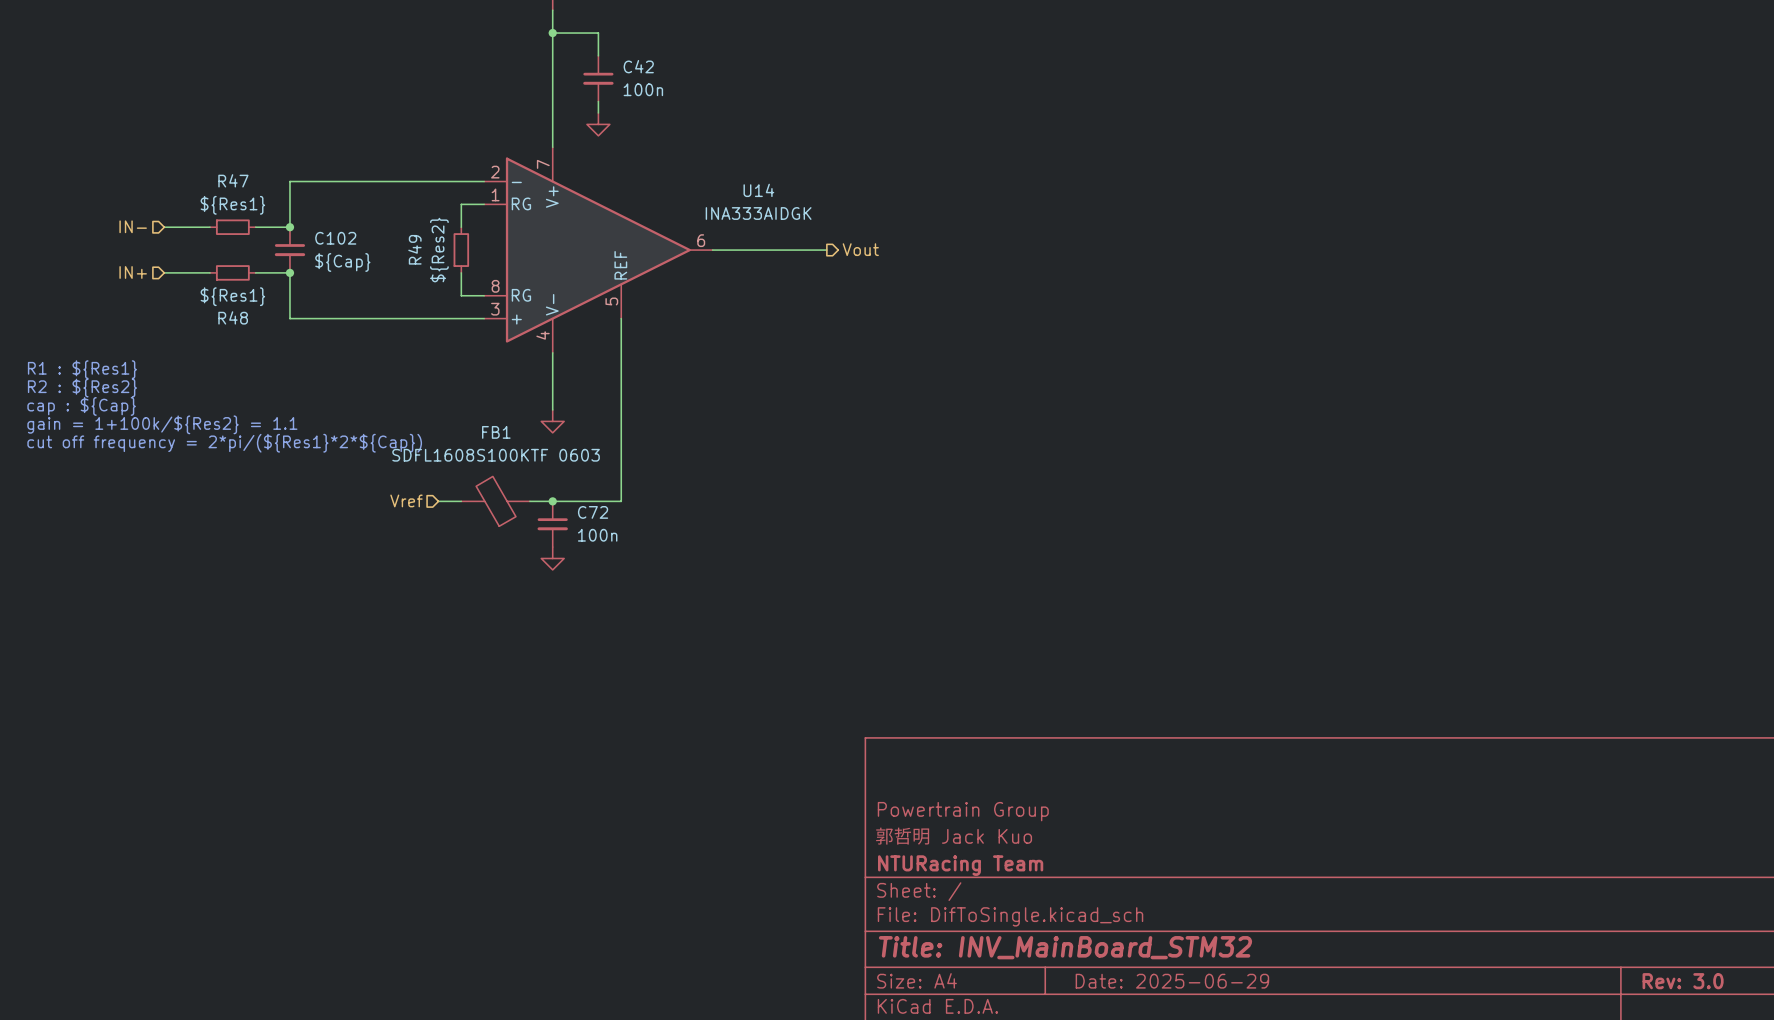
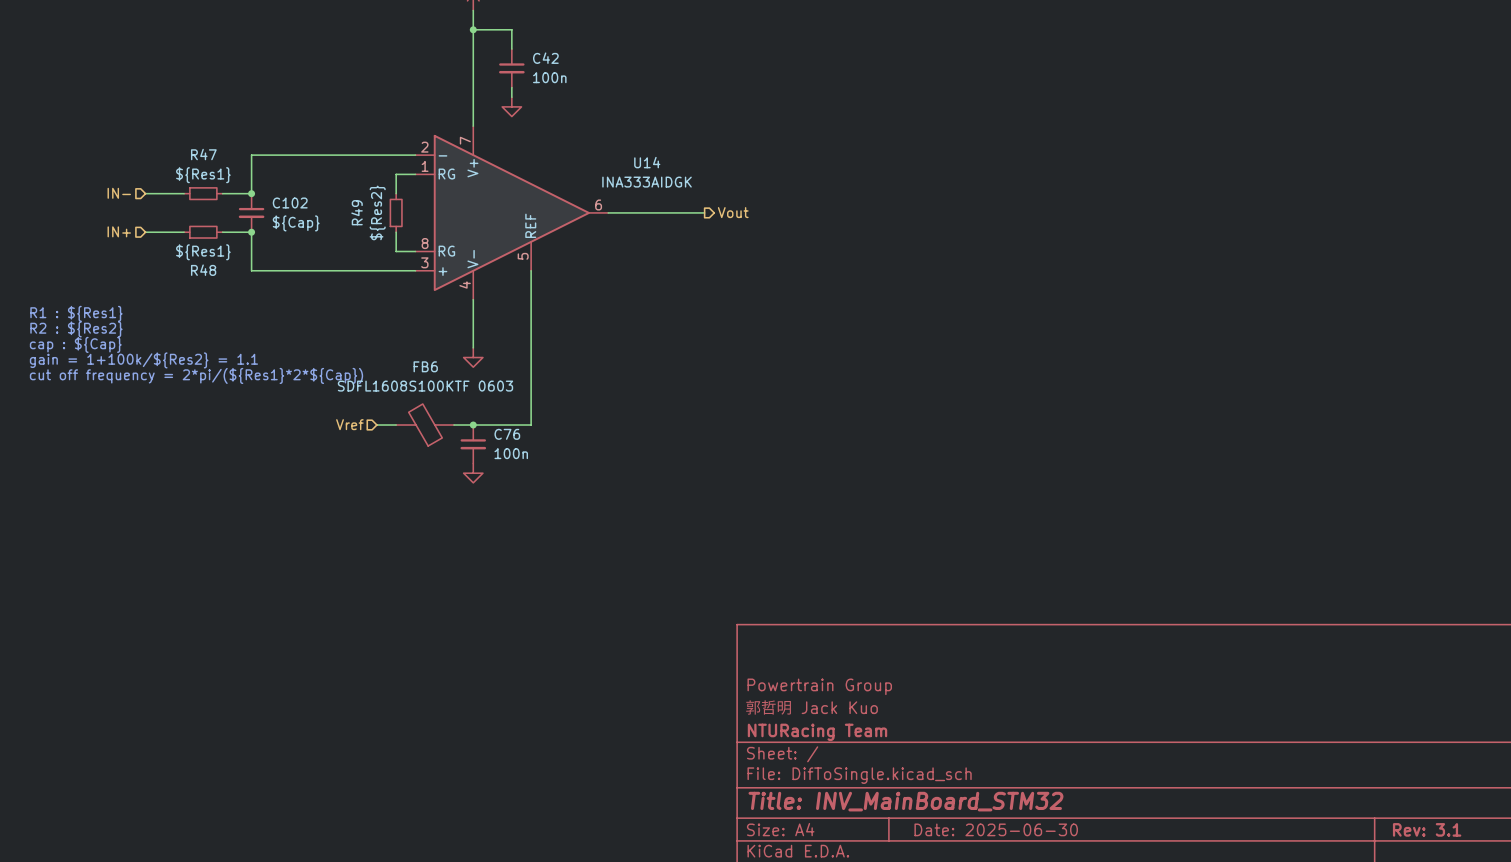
FB1 name: FB1 (496, 432) -> FB6 (425, 366)
C72 name: C72 (593, 512) -> C76 (507, 434)
title block: Date: 2025-06-29 (1172, 981) -> Date: 2025-06-30 (996, 829)
title block: Rev: 3.0 (1683, 981) -> Rev: 3.1 (1427, 829)

